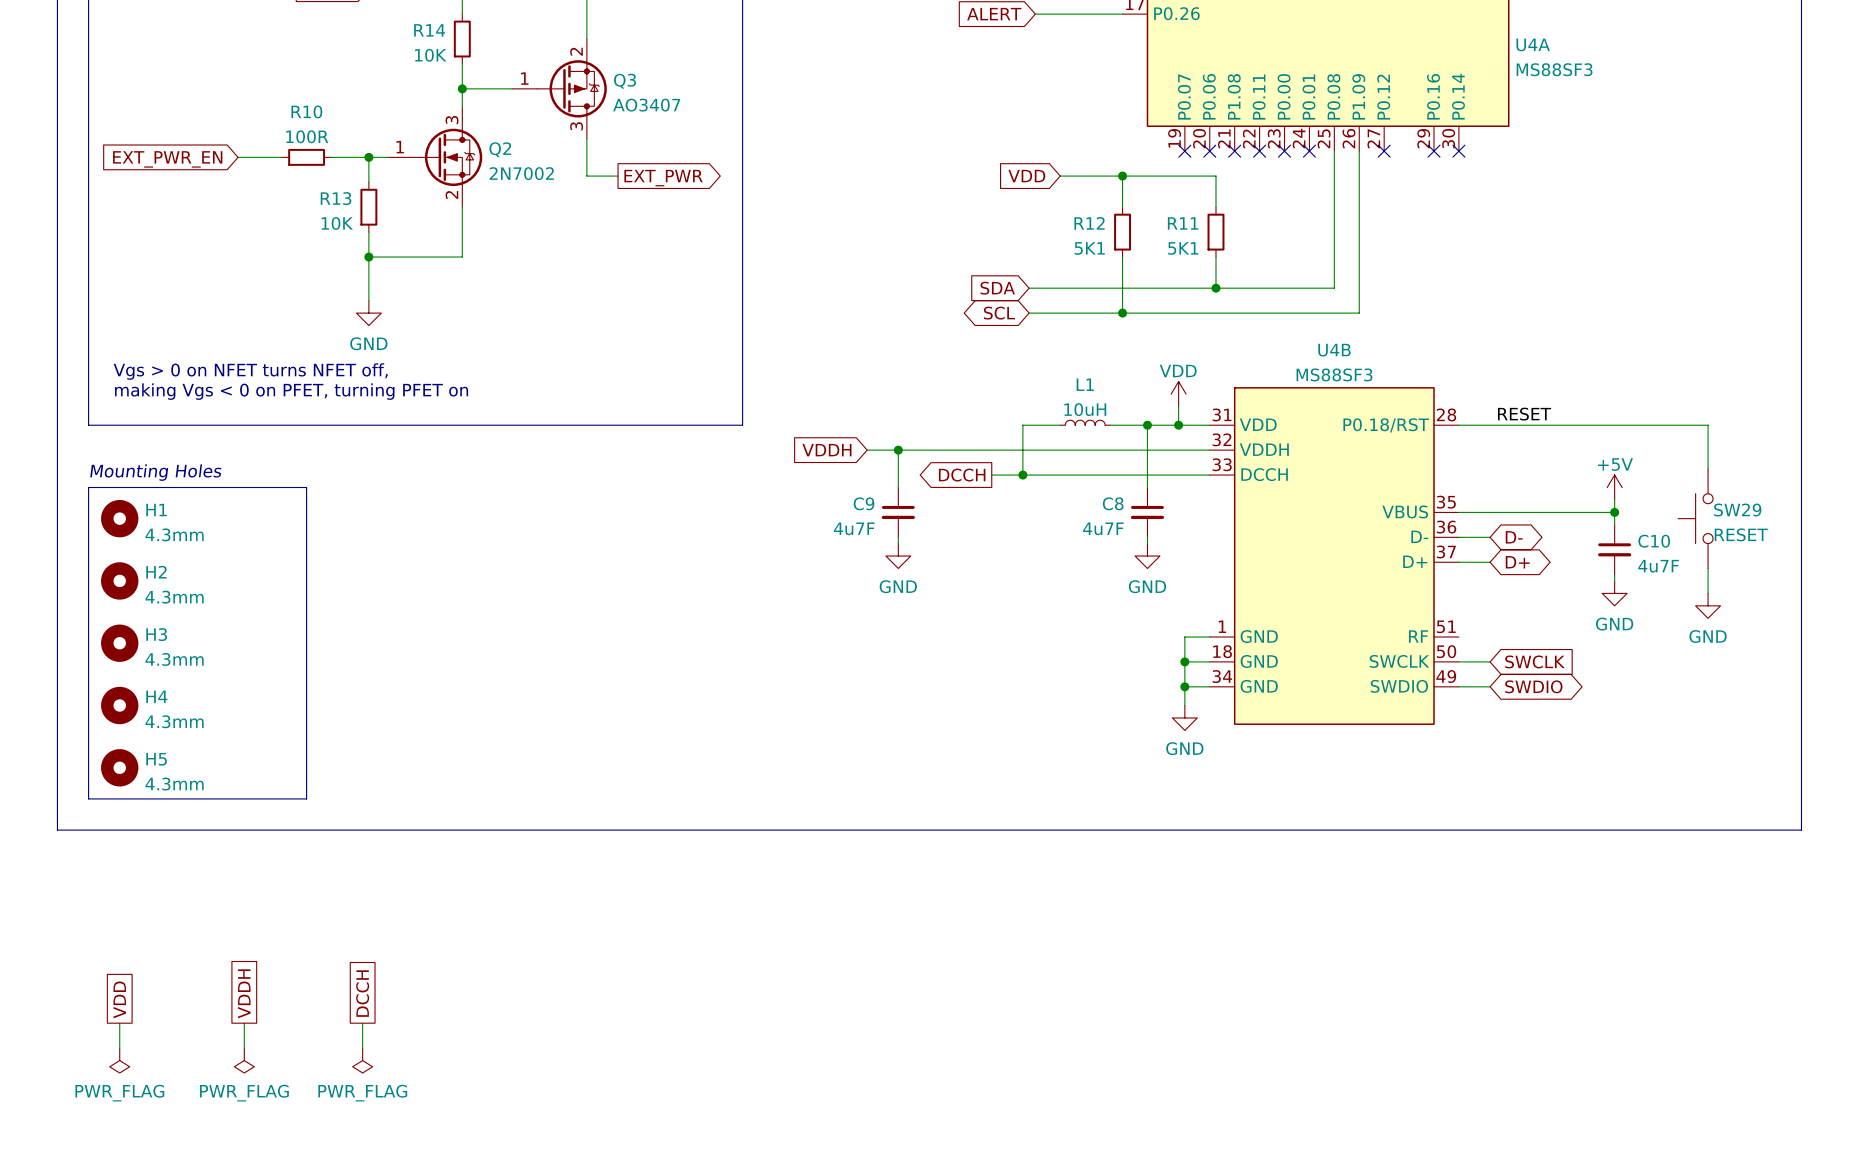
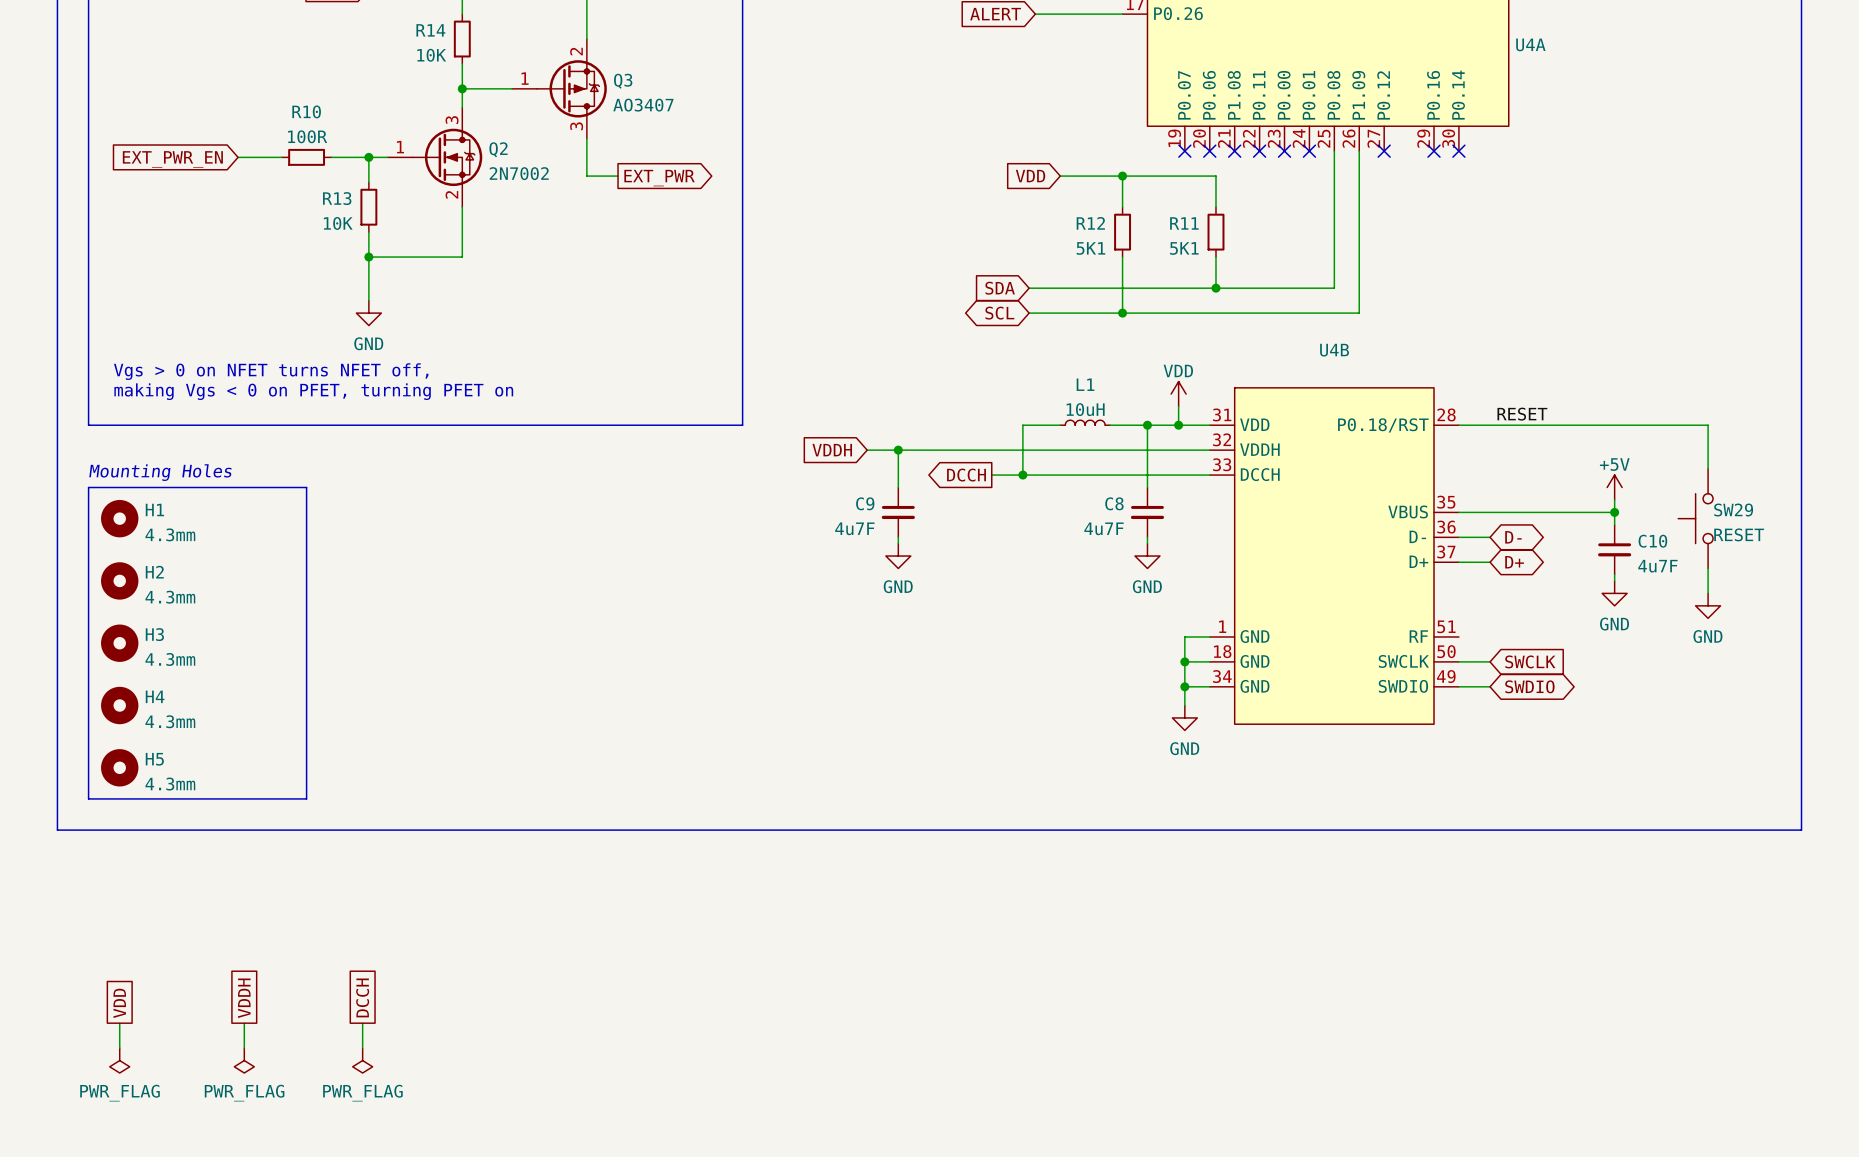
U4A value: MS88SF3 (1554, 69) -> none
U4B value: MS88SF3 (1334, 374) -> none

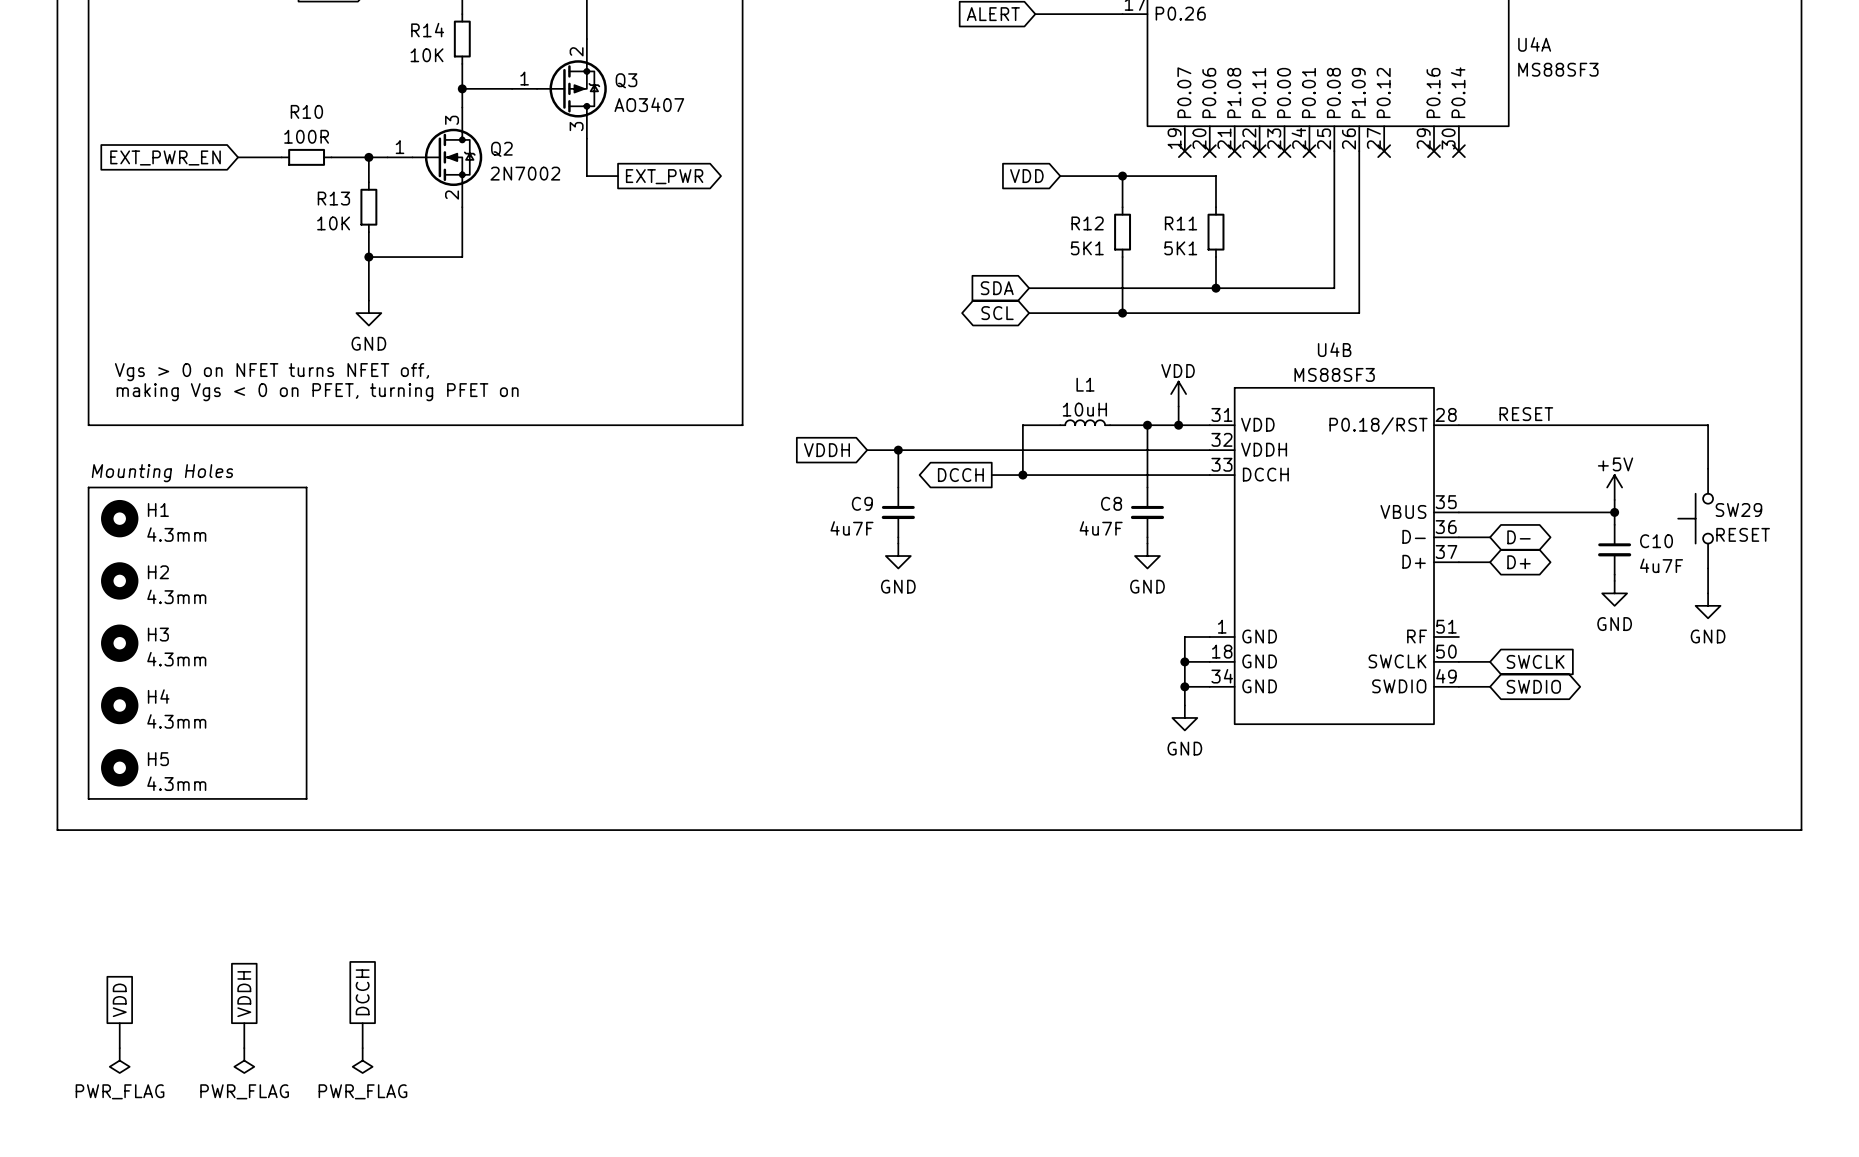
U4A value: none -> MS88SF3 (1558, 69)
U4B value: none -> MS88SF3 (1334, 374)

